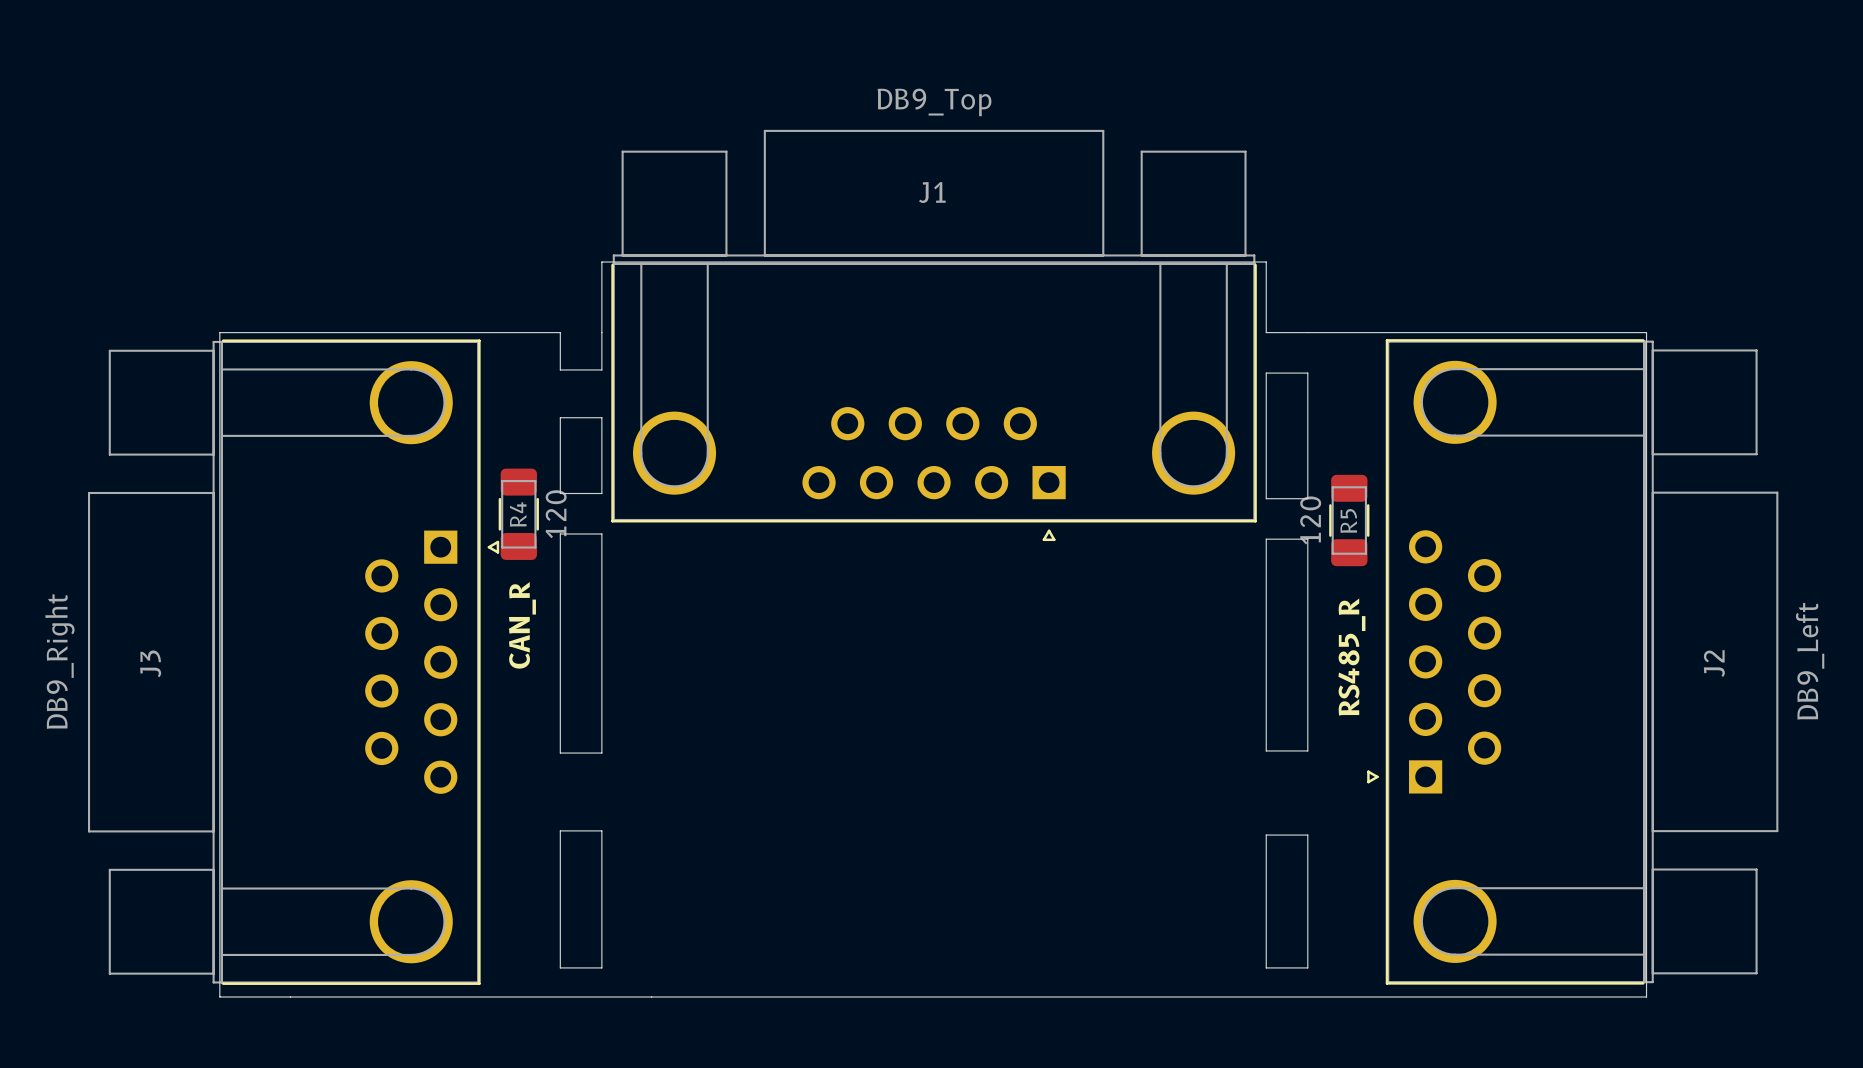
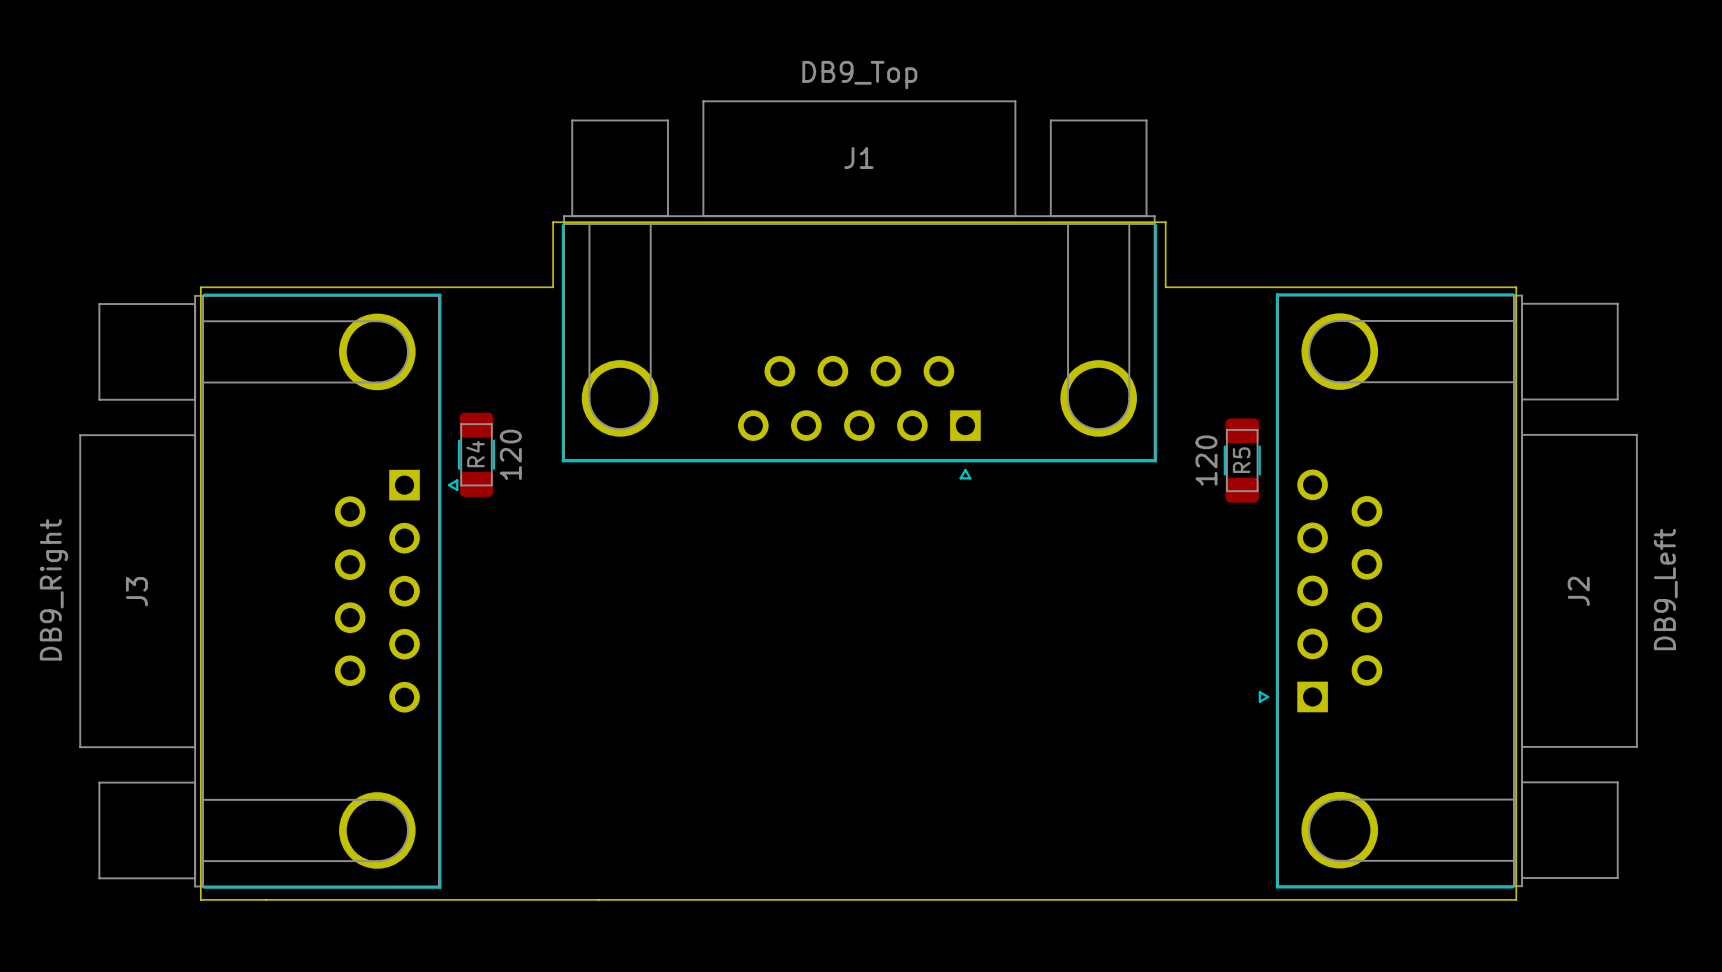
board edge: (560, 332) (560, 369) (601, 369) (601, 332) -> (514, 287) (553, 287)
board edge: (1266, 373) (1266, 498) (1307, 498) (1307, 373) (1266, 373) -> none
board edge: (560, 417) (560, 493) (601, 493) (601, 417) (560, 417) -> none
board edge: (560, 533) (560, 753) (601, 753) (601, 533) (560, 533) -> none
board edge: (1266, 539) (1307, 539) (1307, 750) (1266, 750) (1266, 539) -> none
text: CAN_R (522, 625) -> none
text: RS485_R (1351, 657) -> none
board edge: (560, 830) (601, 830) (601, 967) (560, 967) (560, 830) -> none
board edge: (1266, 835) (1266, 967) (1307, 967) (1307, 835) (1266, 835) -> none

